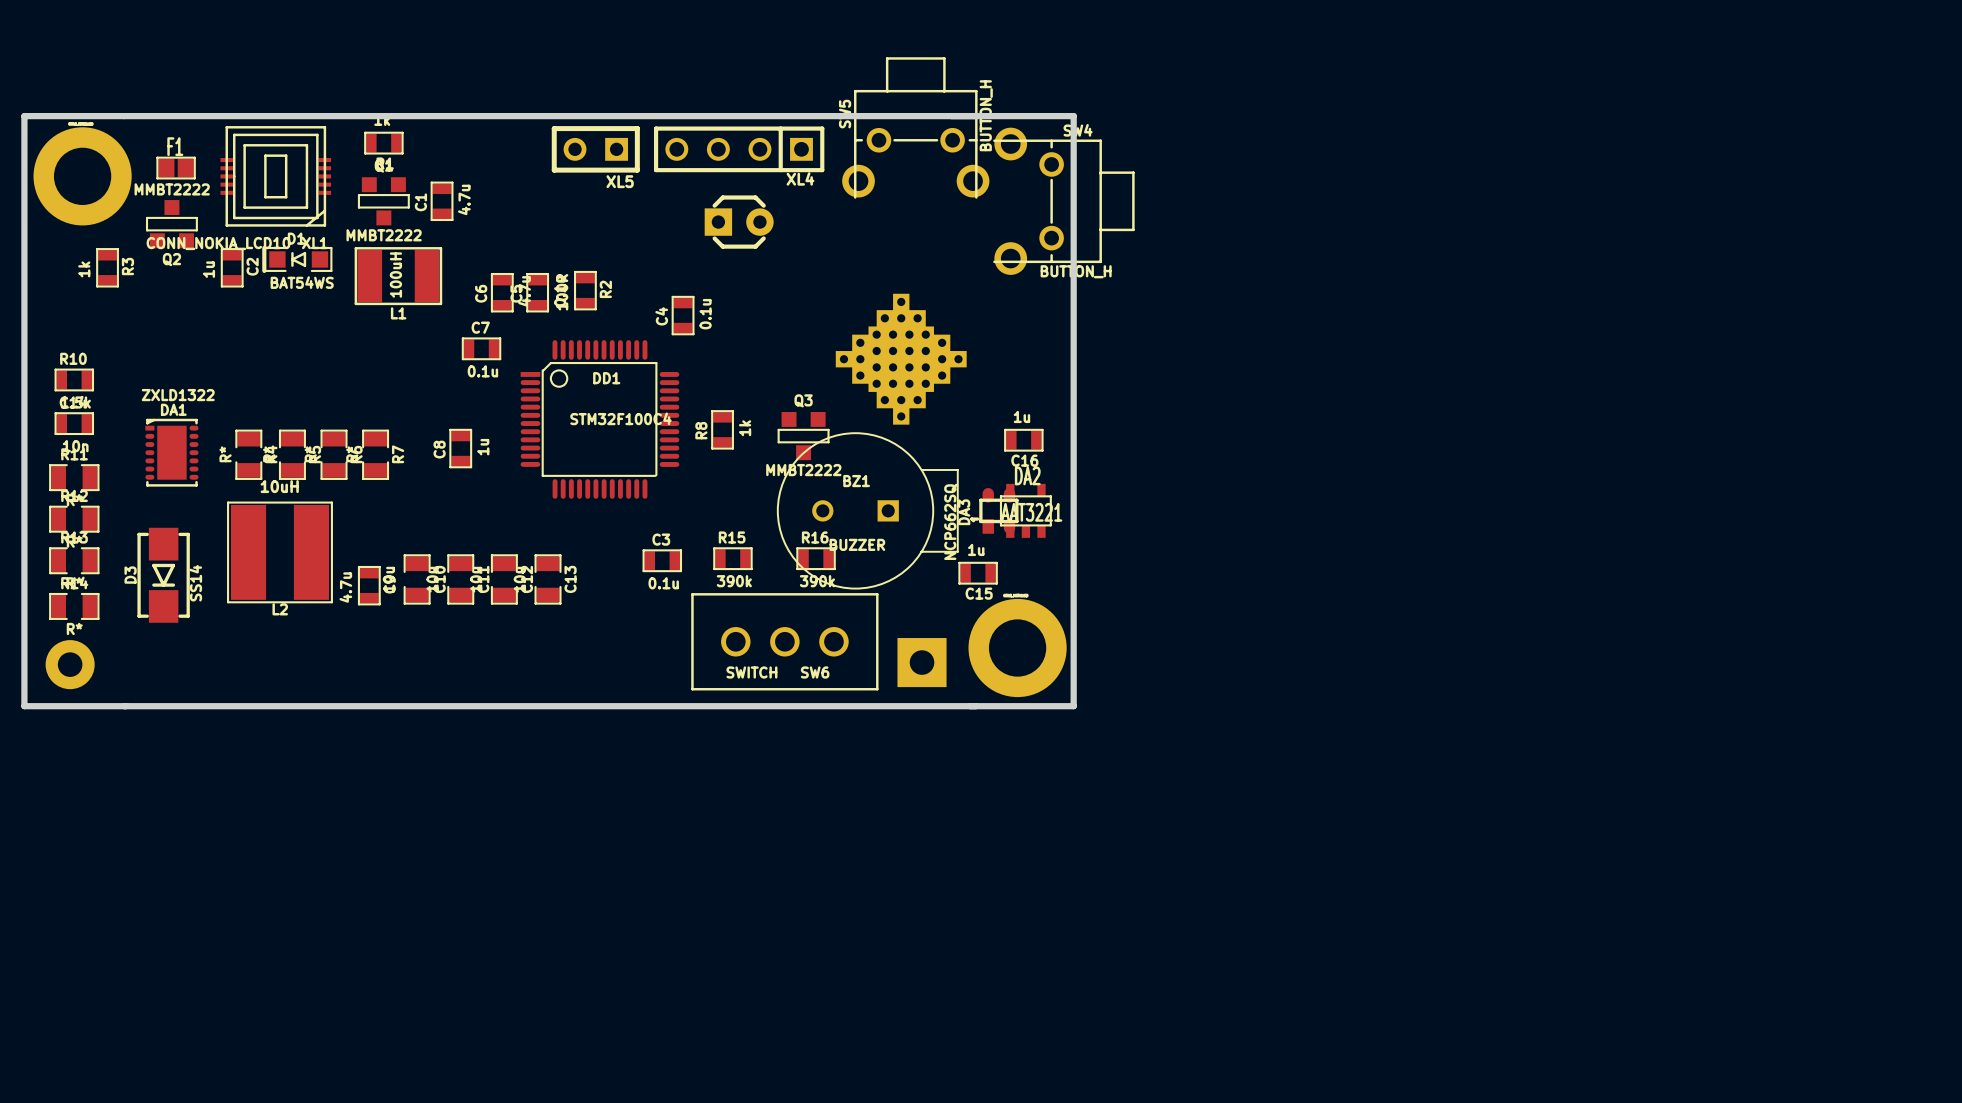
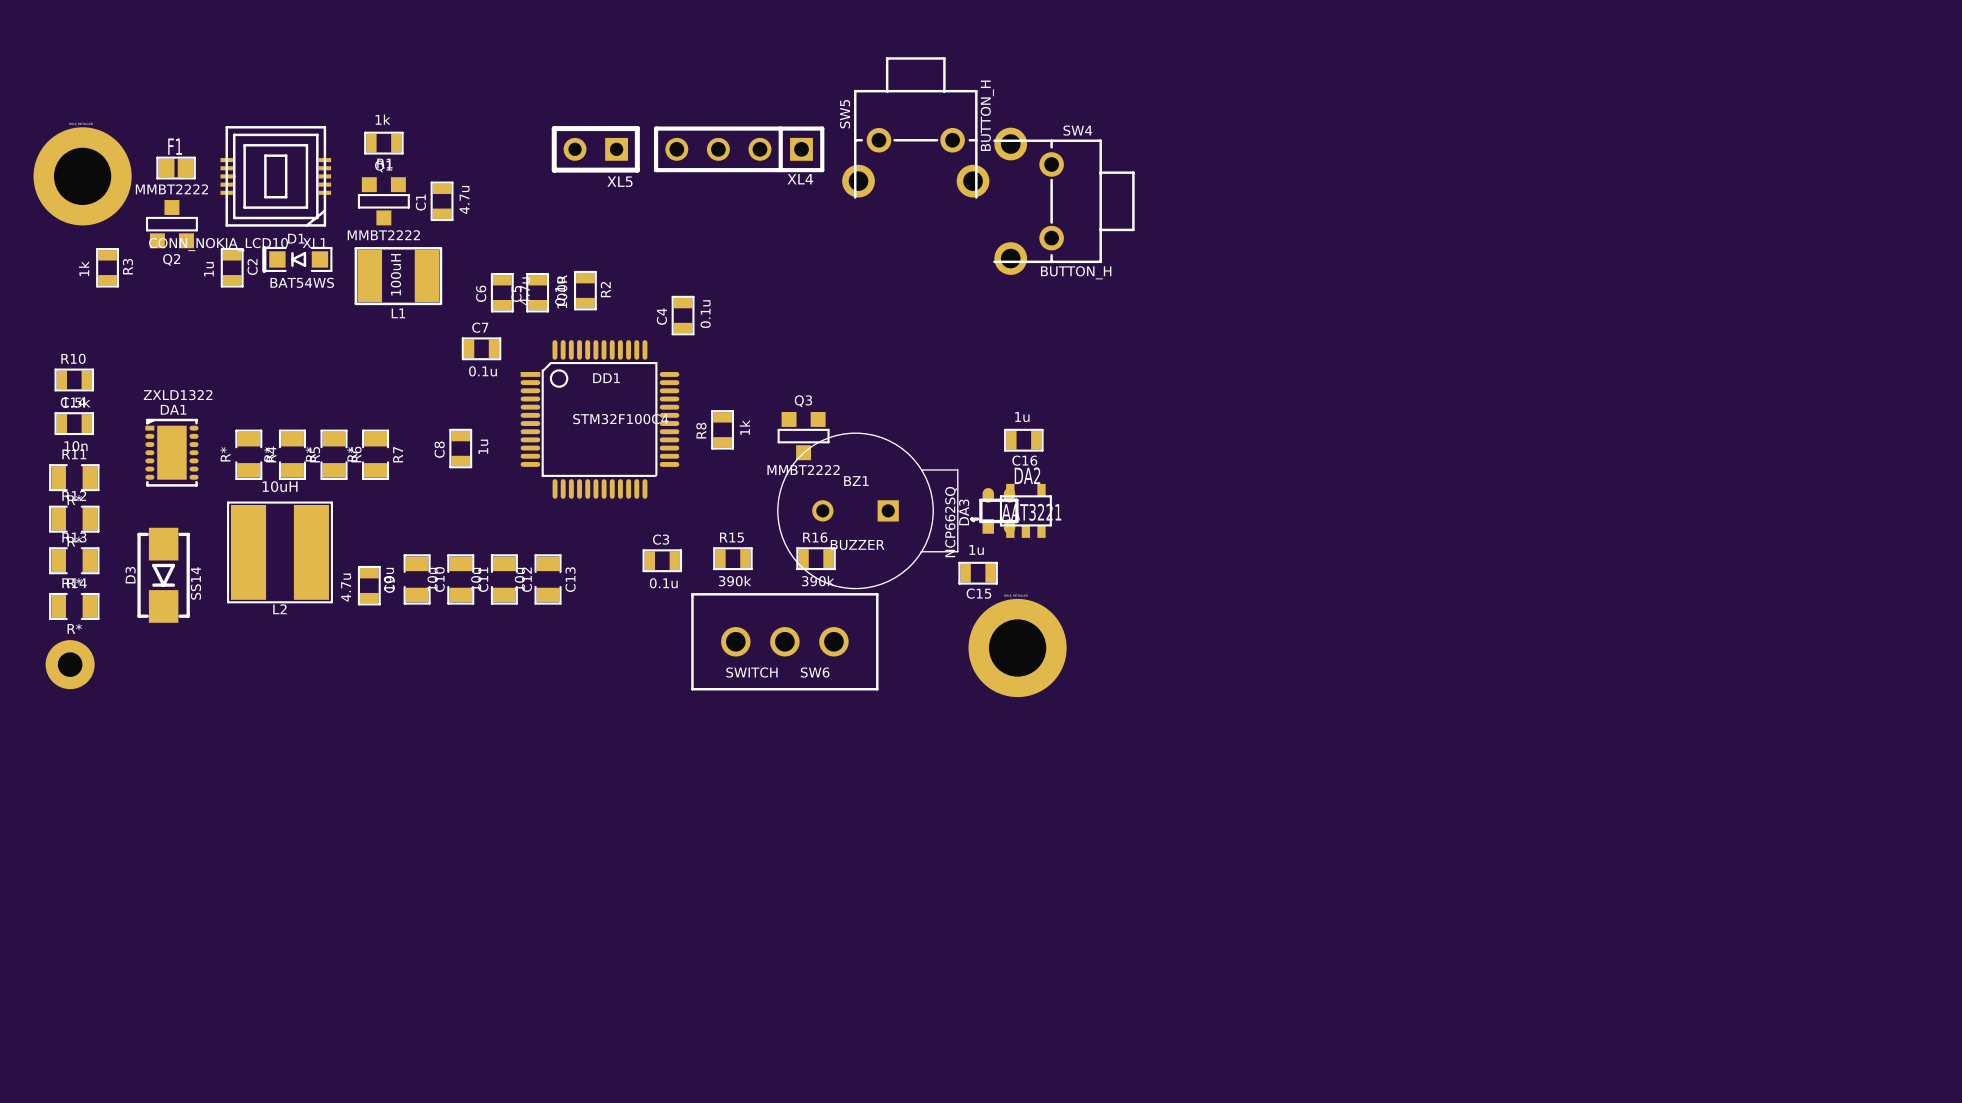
board edge: (24, 116) (1073, 116) (1073, 706) (24, 706) (24, 116) -> none
part: (739, 222) -> none
part: (901, 359) -> none
part: (922, 662) -> none

